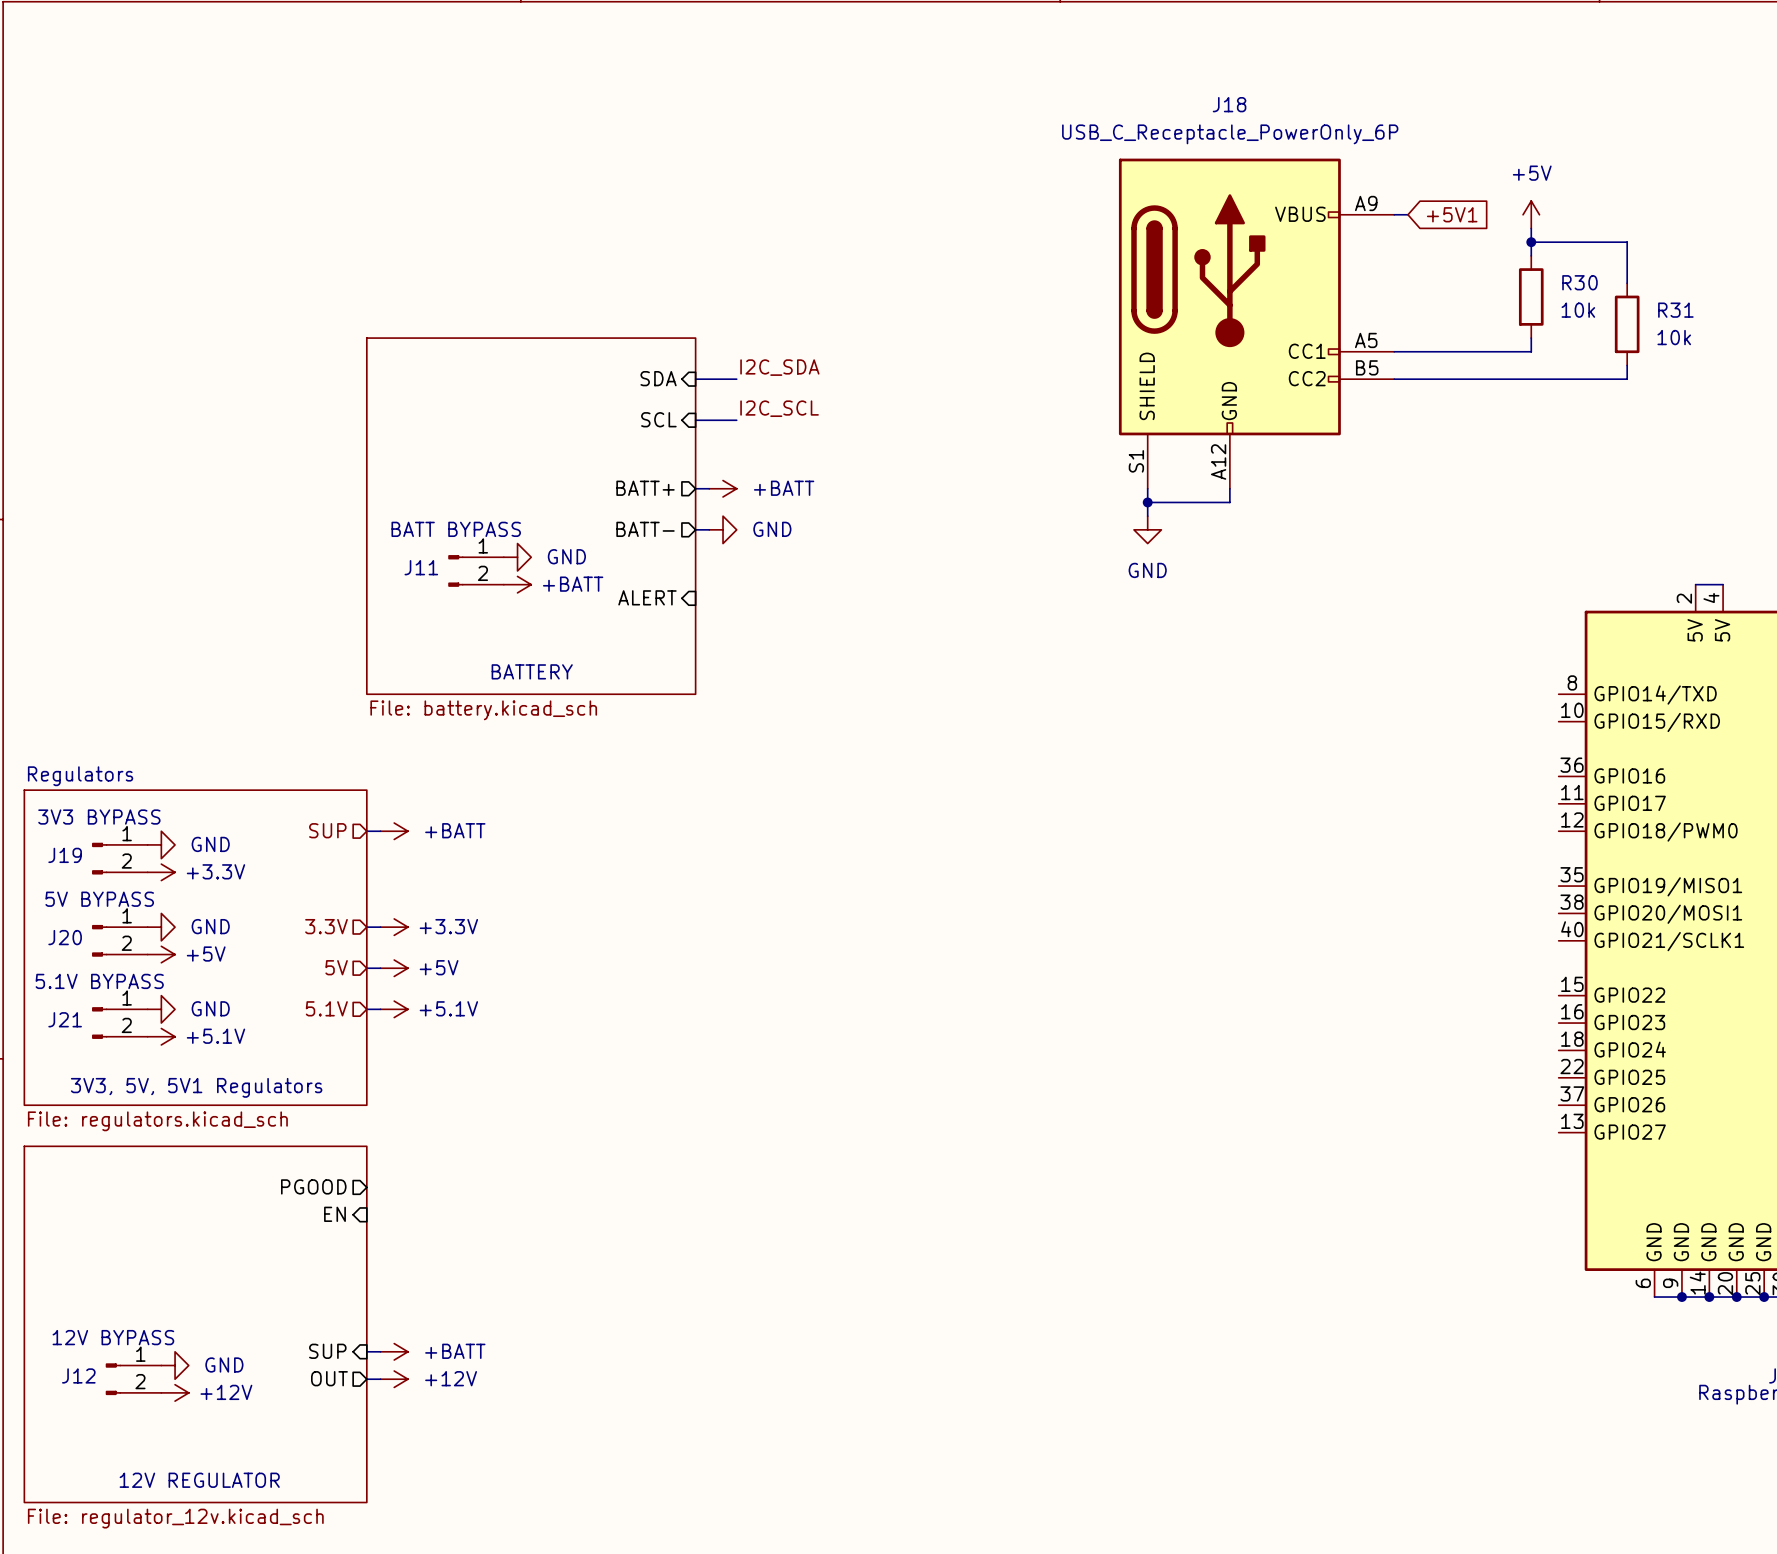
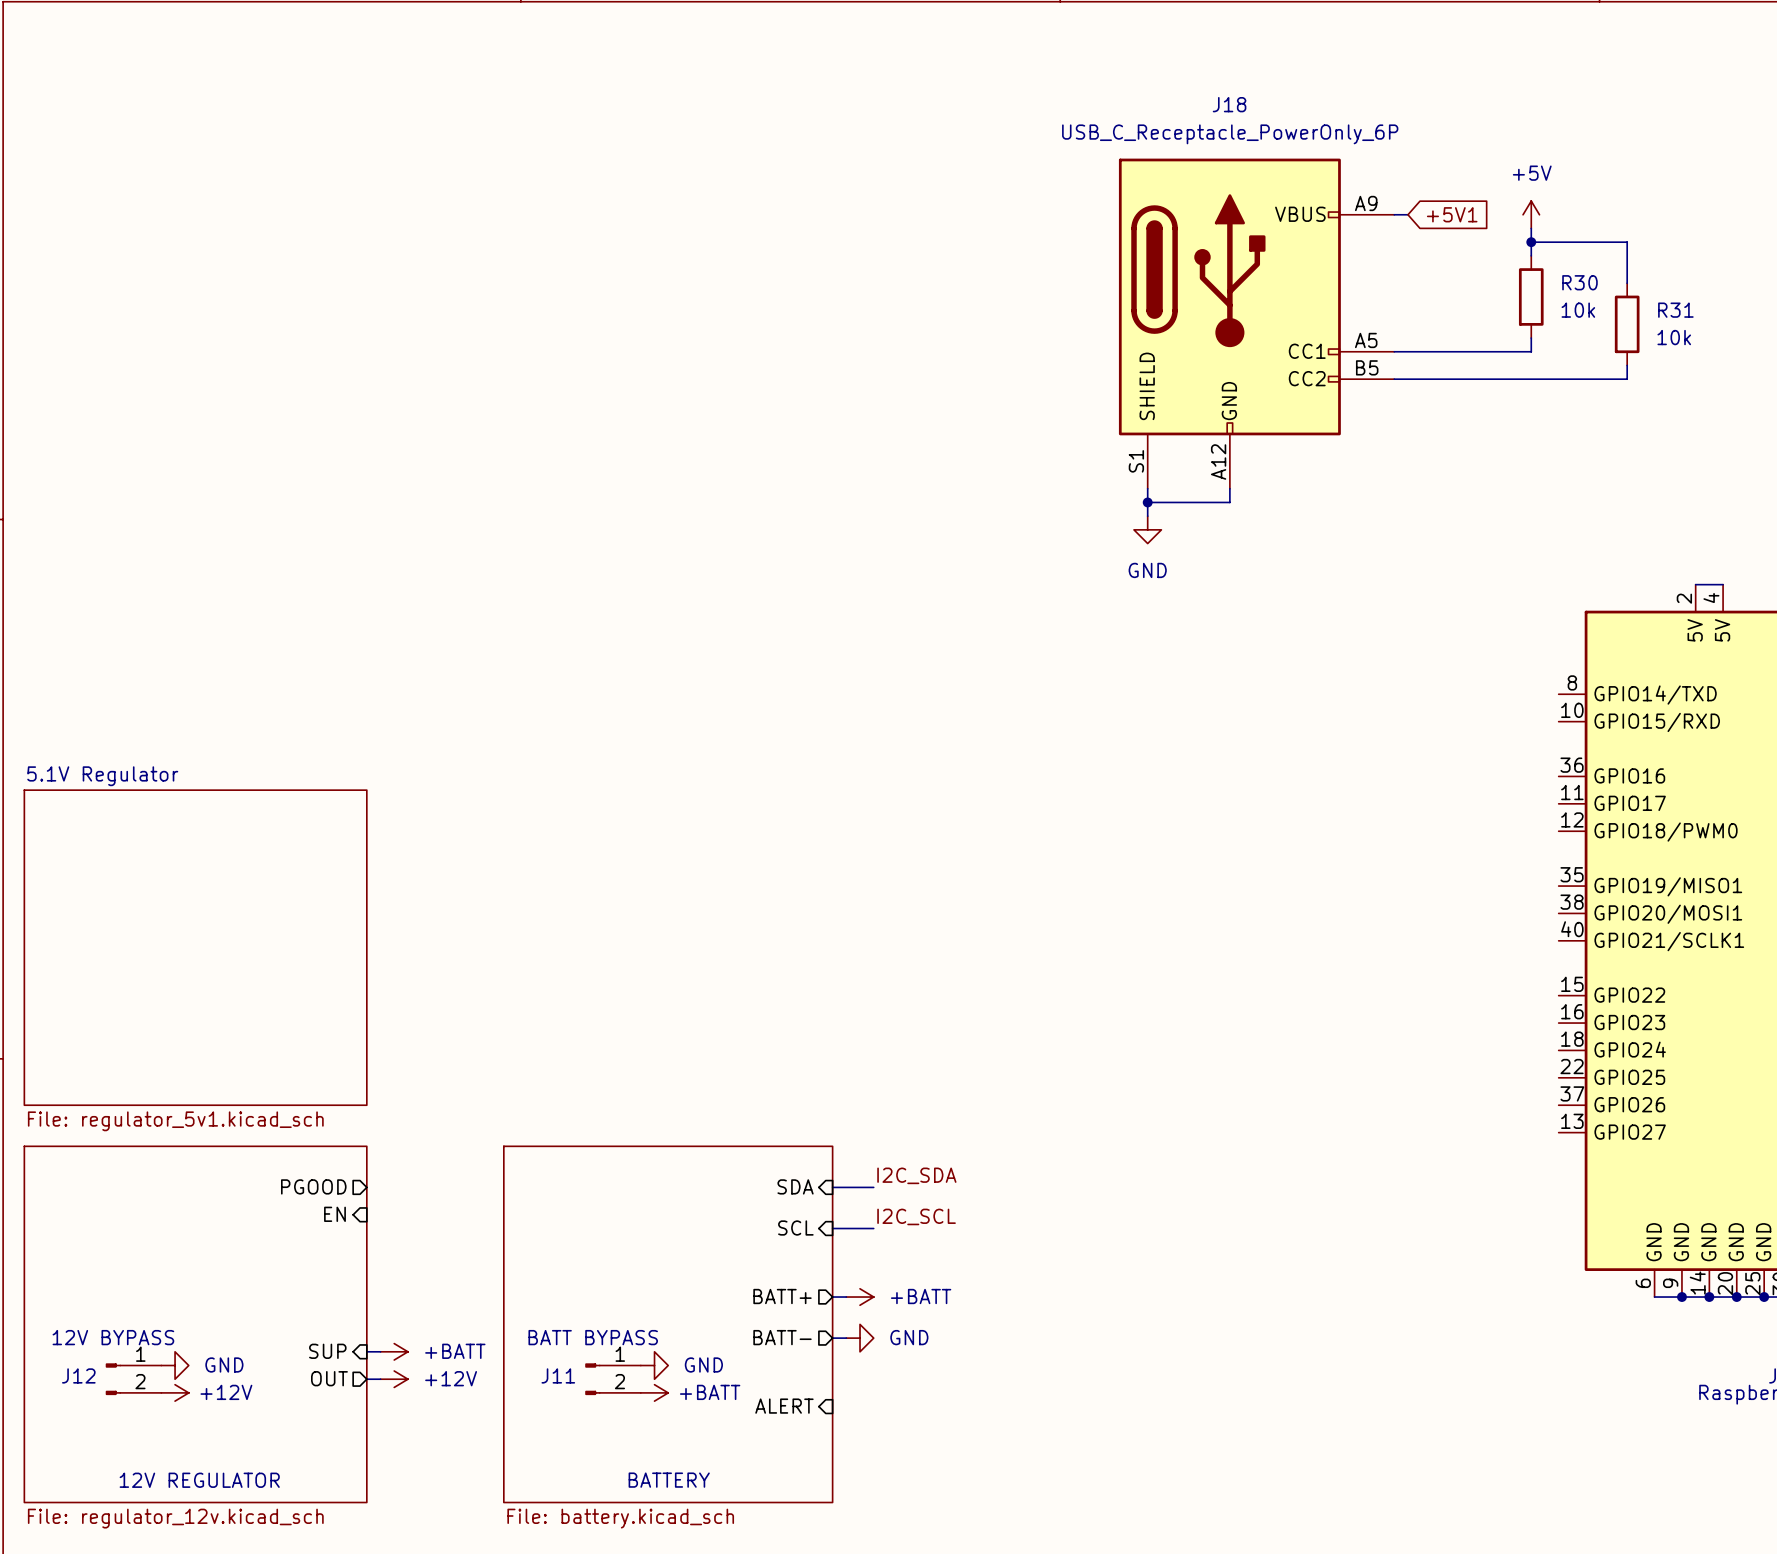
label: I2C_SDA (779, 367) -> none
sheet pin: SDA (658, 378) -> none
wire: (695, 379) (736, 379) -> none
label: I2C_SCL (779, 408) -> none
sheet pin: SCL (658, 419) -> none
wire: (695, 420) (736, 420) -> none
sheet pin: BATT+ (645, 488) -> none
wire: (695, 488) (709, 488) -> none
power symbol: +BATT (723, 488) -> none
sheet: File: battery.kicad_sch (531, 516) -> none
sheet pin: BATT- (645, 529) -> none
wire: (695, 529) (709, 529) -> none
power symbol: GND (723, 529) -> none
power symbol: GND (517, 557) -> none
J11 position: (476, 570) -> (613, 1379)
power symbol: +BATT (517, 584) -> none
sheet pin: ALERT (647, 597) -> none
text: BATTERY (532, 671) -> none
sheet Regulators name: Regulators (80, 776) -> 5.1V Regulator (102, 776)
hierarchical label: SUP (327, 830) -> none
wire: (366, 831) (380, 831) -> none
power symbol: +BATT (394, 831) -> none
power symbol: GND (161, 844) -> none
J19: 3V3 BYPASS (119, 858) -> none
power symbol: +3.3V (161, 872) -> none
hierarchical label: 3.3V (326, 926) -> none
power symbol: GND (161, 927) -> none
wire: (366, 927) (380, 927) -> none
power symbol: +3.3V (394, 927) -> none
J20: 5V BYPASS (119, 940) -> none
power symbol: +5V (161, 954) -> none
hierarchical label: 5V (336, 967) -> none
wire: (366, 968) (380, 968) -> none
power symbol: +5V (394, 968) -> none
hierarchical label: 5.1V (326, 1008) -> none
power symbol: GND (161, 1009) -> none
wire: (366, 1009) (380, 1009) -> none
power symbol: +5.1V (394, 1009) -> none
J21: 5.1V BYPASS (119, 1023) -> none
power symbol: +5.1V (161, 1036) -> none
text: 3V3, 5V, 5V1 Regulators (196, 1087) -> none
sheet Regulators value: File: regulators.kicad_sch (157, 1121) -> File: regulator_5v1.kicad_sch (175, 1121)
label: none -> I2C_SDA (916, 1175)
sheet pin: none -> SDA (795, 1186)
wire: none -> (832, 1187) (873, 1187)
label: none -> I2C_SCL (916, 1216)
sheet pin: none -> SCL (795, 1228)
wire: none -> (832, 1228) (873, 1228)
sheet pin: none -> BATT+ (782, 1296)
wire: none -> (832, 1297) (846, 1297)
power symbol: none -> +BATT (860, 1297)
sheet: none -> File: battery.kicad_sch (668, 1324)
sheet pin: none -> BATT- (782, 1337)
wire: none -> (832, 1338) (846, 1338)
power symbol: none -> GND (860, 1338)
power symbol: none -> GND (654, 1365)
power symbol: none -> +BATT (654, 1392)
sheet pin: none -> ALERT (784, 1406)
text: none -> BATTERY (669, 1480)

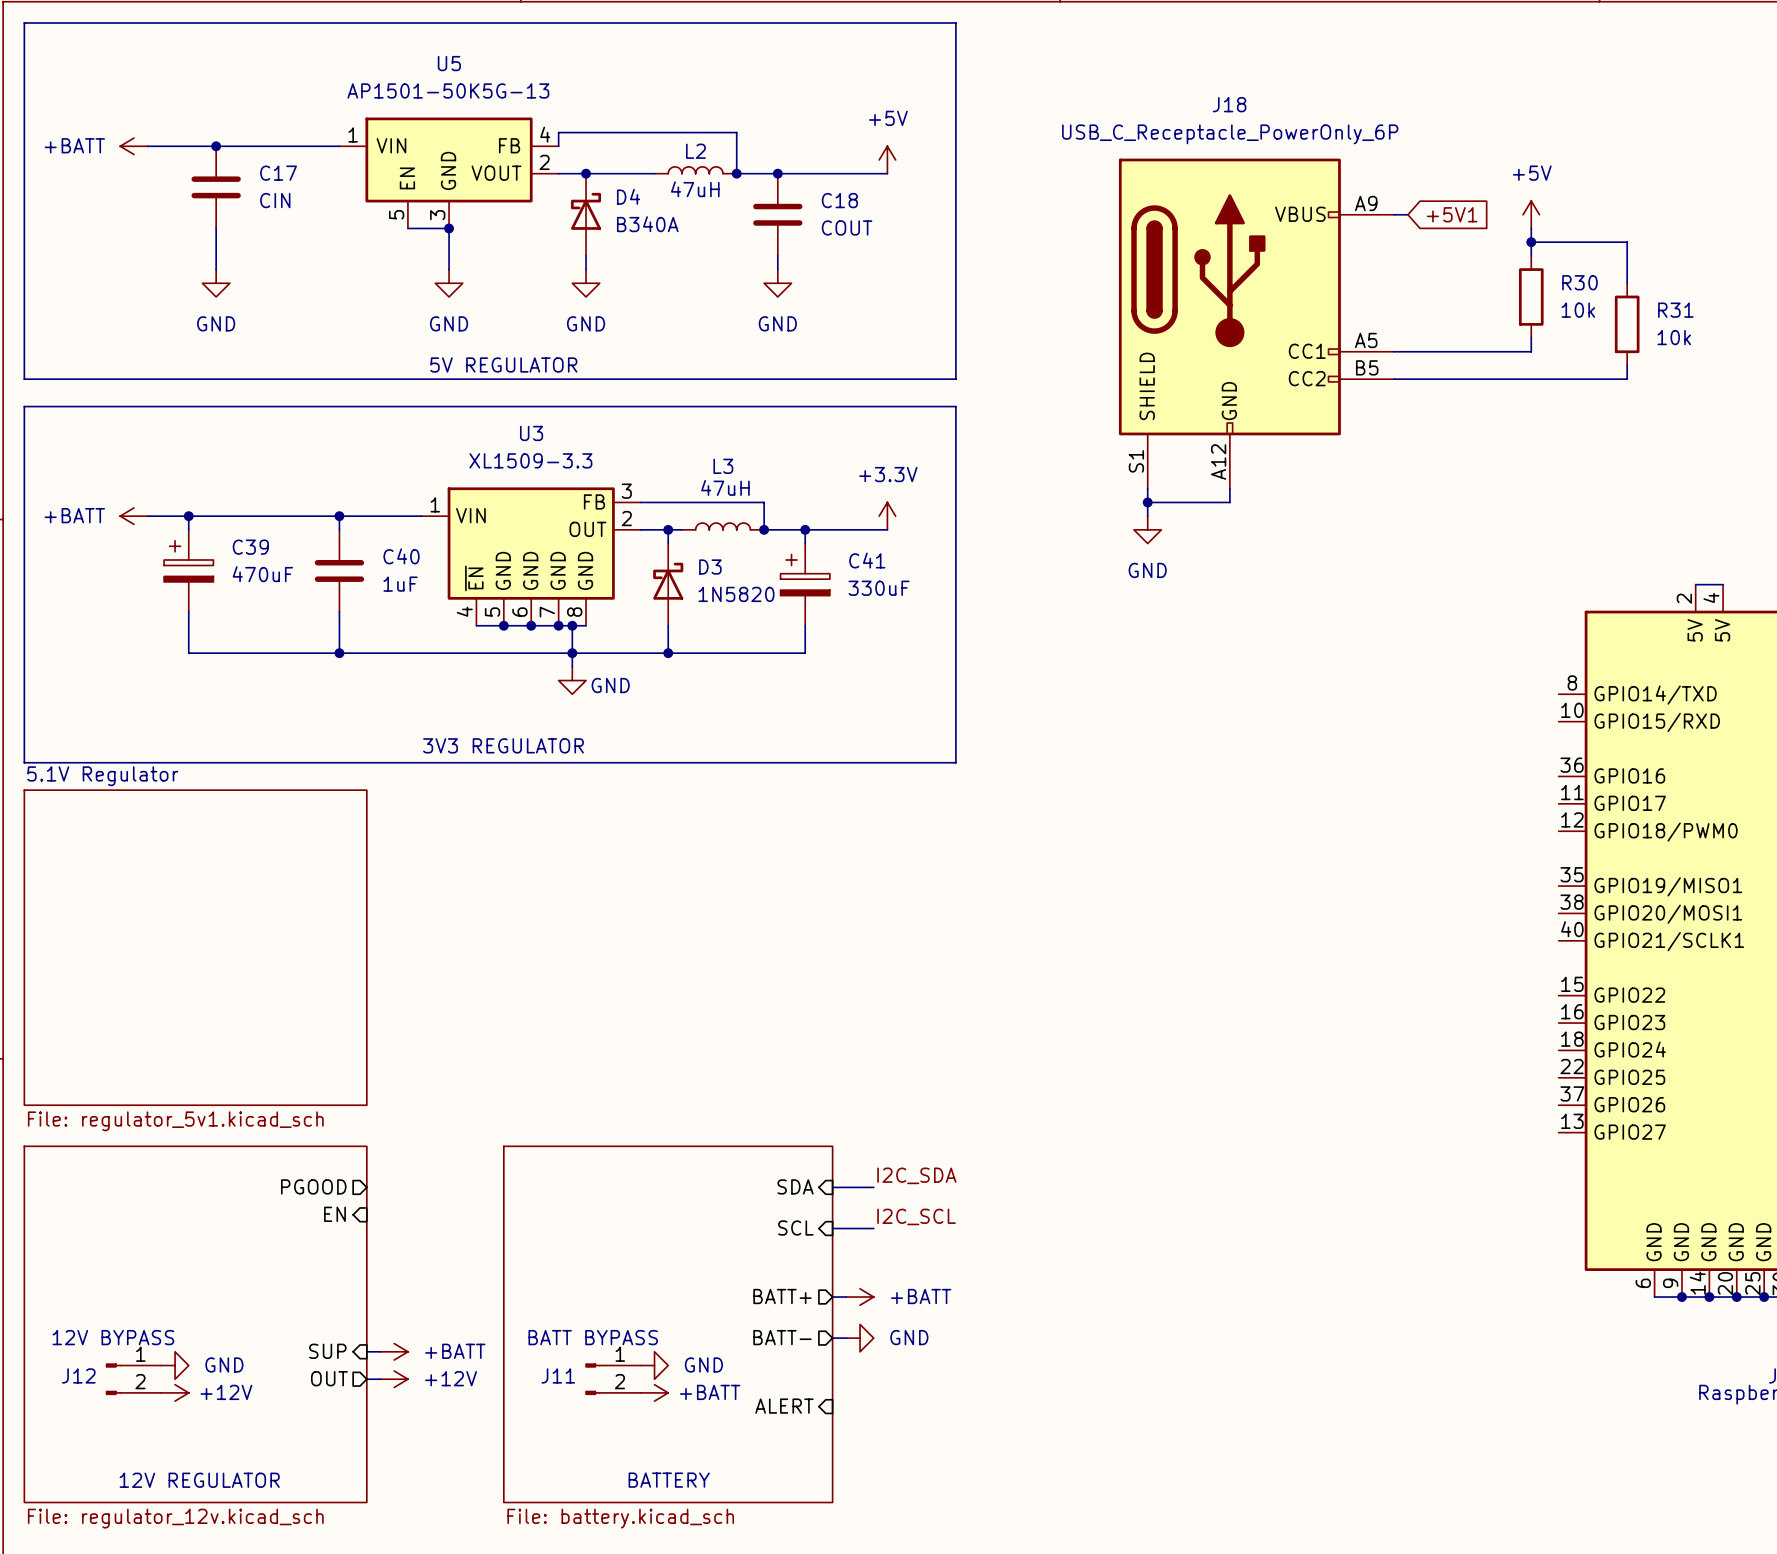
line: none -> (24, 22) (24, 379) (955, 379) (955, 22) (24, 22)
power symbol: none -> +BATT (133, 146)
wire: none -> (147, 146) (339, 146)
junction: none -> (216, 146)
wire: none -> (558, 146) (558, 132) (736, 132) (736, 173) (887, 173)
power symbol: none -> +5V (887, 159)
L2: none -> 47uH (695, 170)
U5: none -> AP1501-50K5G-13 (449, 172)
wire: none -> (558, 173) (654, 173)
junction: none -> (586, 173)
junction: none -> (736, 173)
junction: none -> (777, 173)
C17: none -> CIN (216, 187)
D4: none -> B340A (586, 214)
C18: none -> COUT (777, 214)
wire: none -> (216, 228) (216, 269)
wire: none -> (407, 228) (449, 228) (449, 269)
junction: none -> (449, 228)
wire: none -> (586, 255) (586, 269)
wire: none -> (777, 255) (777, 269)
power symbol: none -> GND (216, 283)
power symbol: none -> GND (449, 283)
power symbol: none -> GND (586, 283)
power symbol: none -> GND (777, 283)
text: none -> 5V REGULATOR (503, 365)
line: none -> (24, 406) (955, 406) (955, 762) (24, 762) (24, 406)
wire: none -> (640, 502) (764, 502) (764, 529) (887, 529)
power symbol: none -> +BATT (133, 516)
wire: none -> (147, 516) (421, 516)
wire: none -> (188, 516) (188, 529)
junction: none -> (188, 516)
wire: none -> (339, 516) (339, 529)
junction: none -> (339, 516)
power symbol: none -> +3.3V (887, 516)
L3: none -> 47uH (723, 526)
wire: none -> (640, 529) (681, 529)
wire: none -> (668, 529) (668, 543)
junction: none -> (668, 529)
junction: none -> (764, 529)
wire: none -> (805, 529) (805, 543)
junction: none -> (805, 529)
U3: none -> XL1509-3.3 (531, 556)
C39: none -> 470uF (188, 570)
C40: none -> 1uF (339, 570)
D3: none -> 1N5820 (668, 584)
C41: none -> 330uF (805, 584)
wire: none -> (188, 612) (188, 653) (805, 653) (805, 625)
wire: none -> (339, 612) (339, 653)
wire: none -> (476, 625) (586, 625)
junction: none -> (503, 625)
junction: none -> (531, 625)
junction: none -> (558, 625)
wire: none -> (572, 625) (572, 666)
junction: none -> (572, 625)
wire: none -> (668, 625) (668, 653)
junction: none -> (339, 653)
junction: none -> (572, 653)
junction: none -> (668, 653)
power symbol: none -> GND (572, 680)
text: none -> 3V3 REGULATOR (503, 745)

